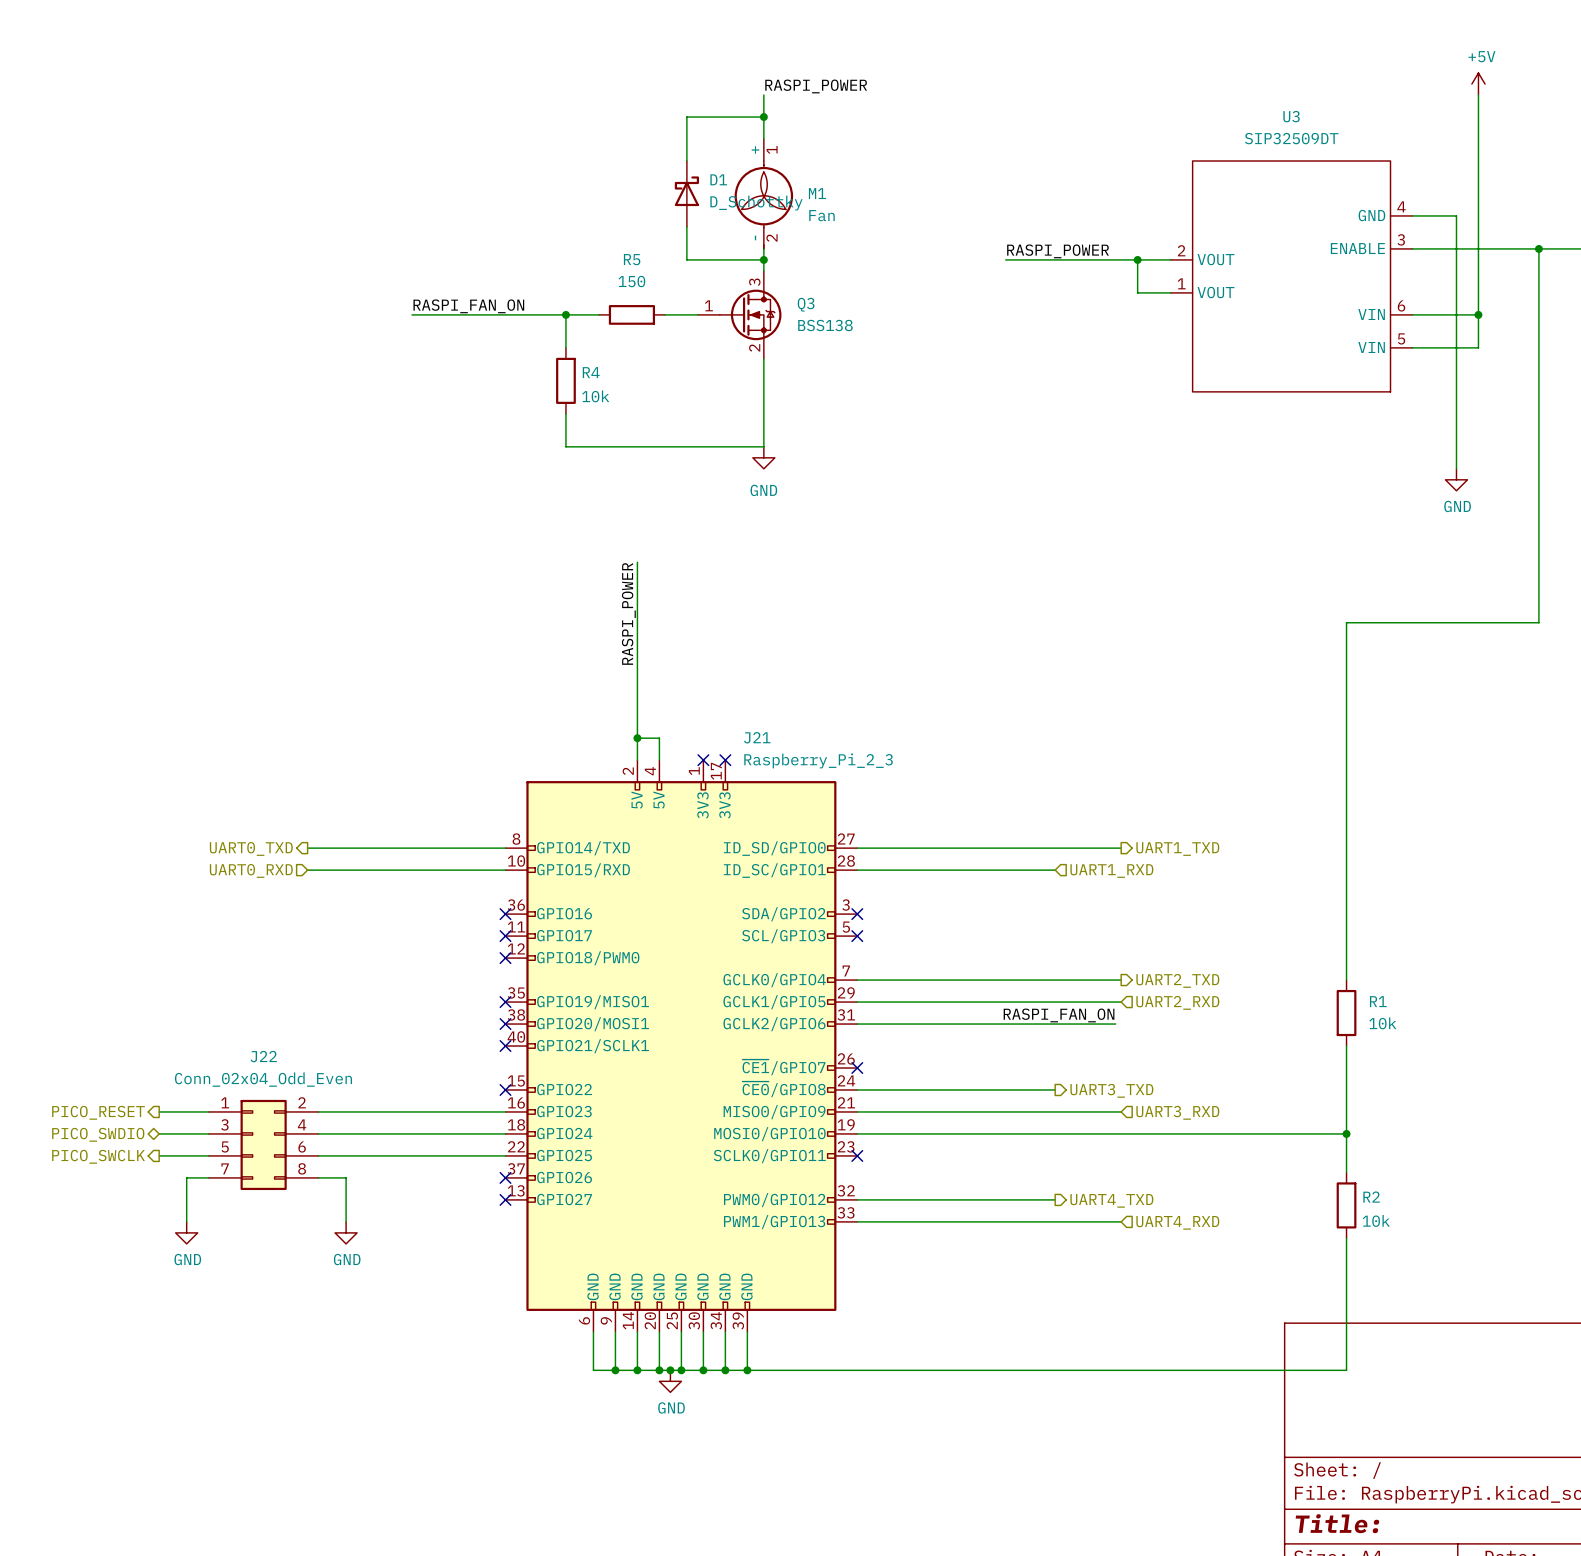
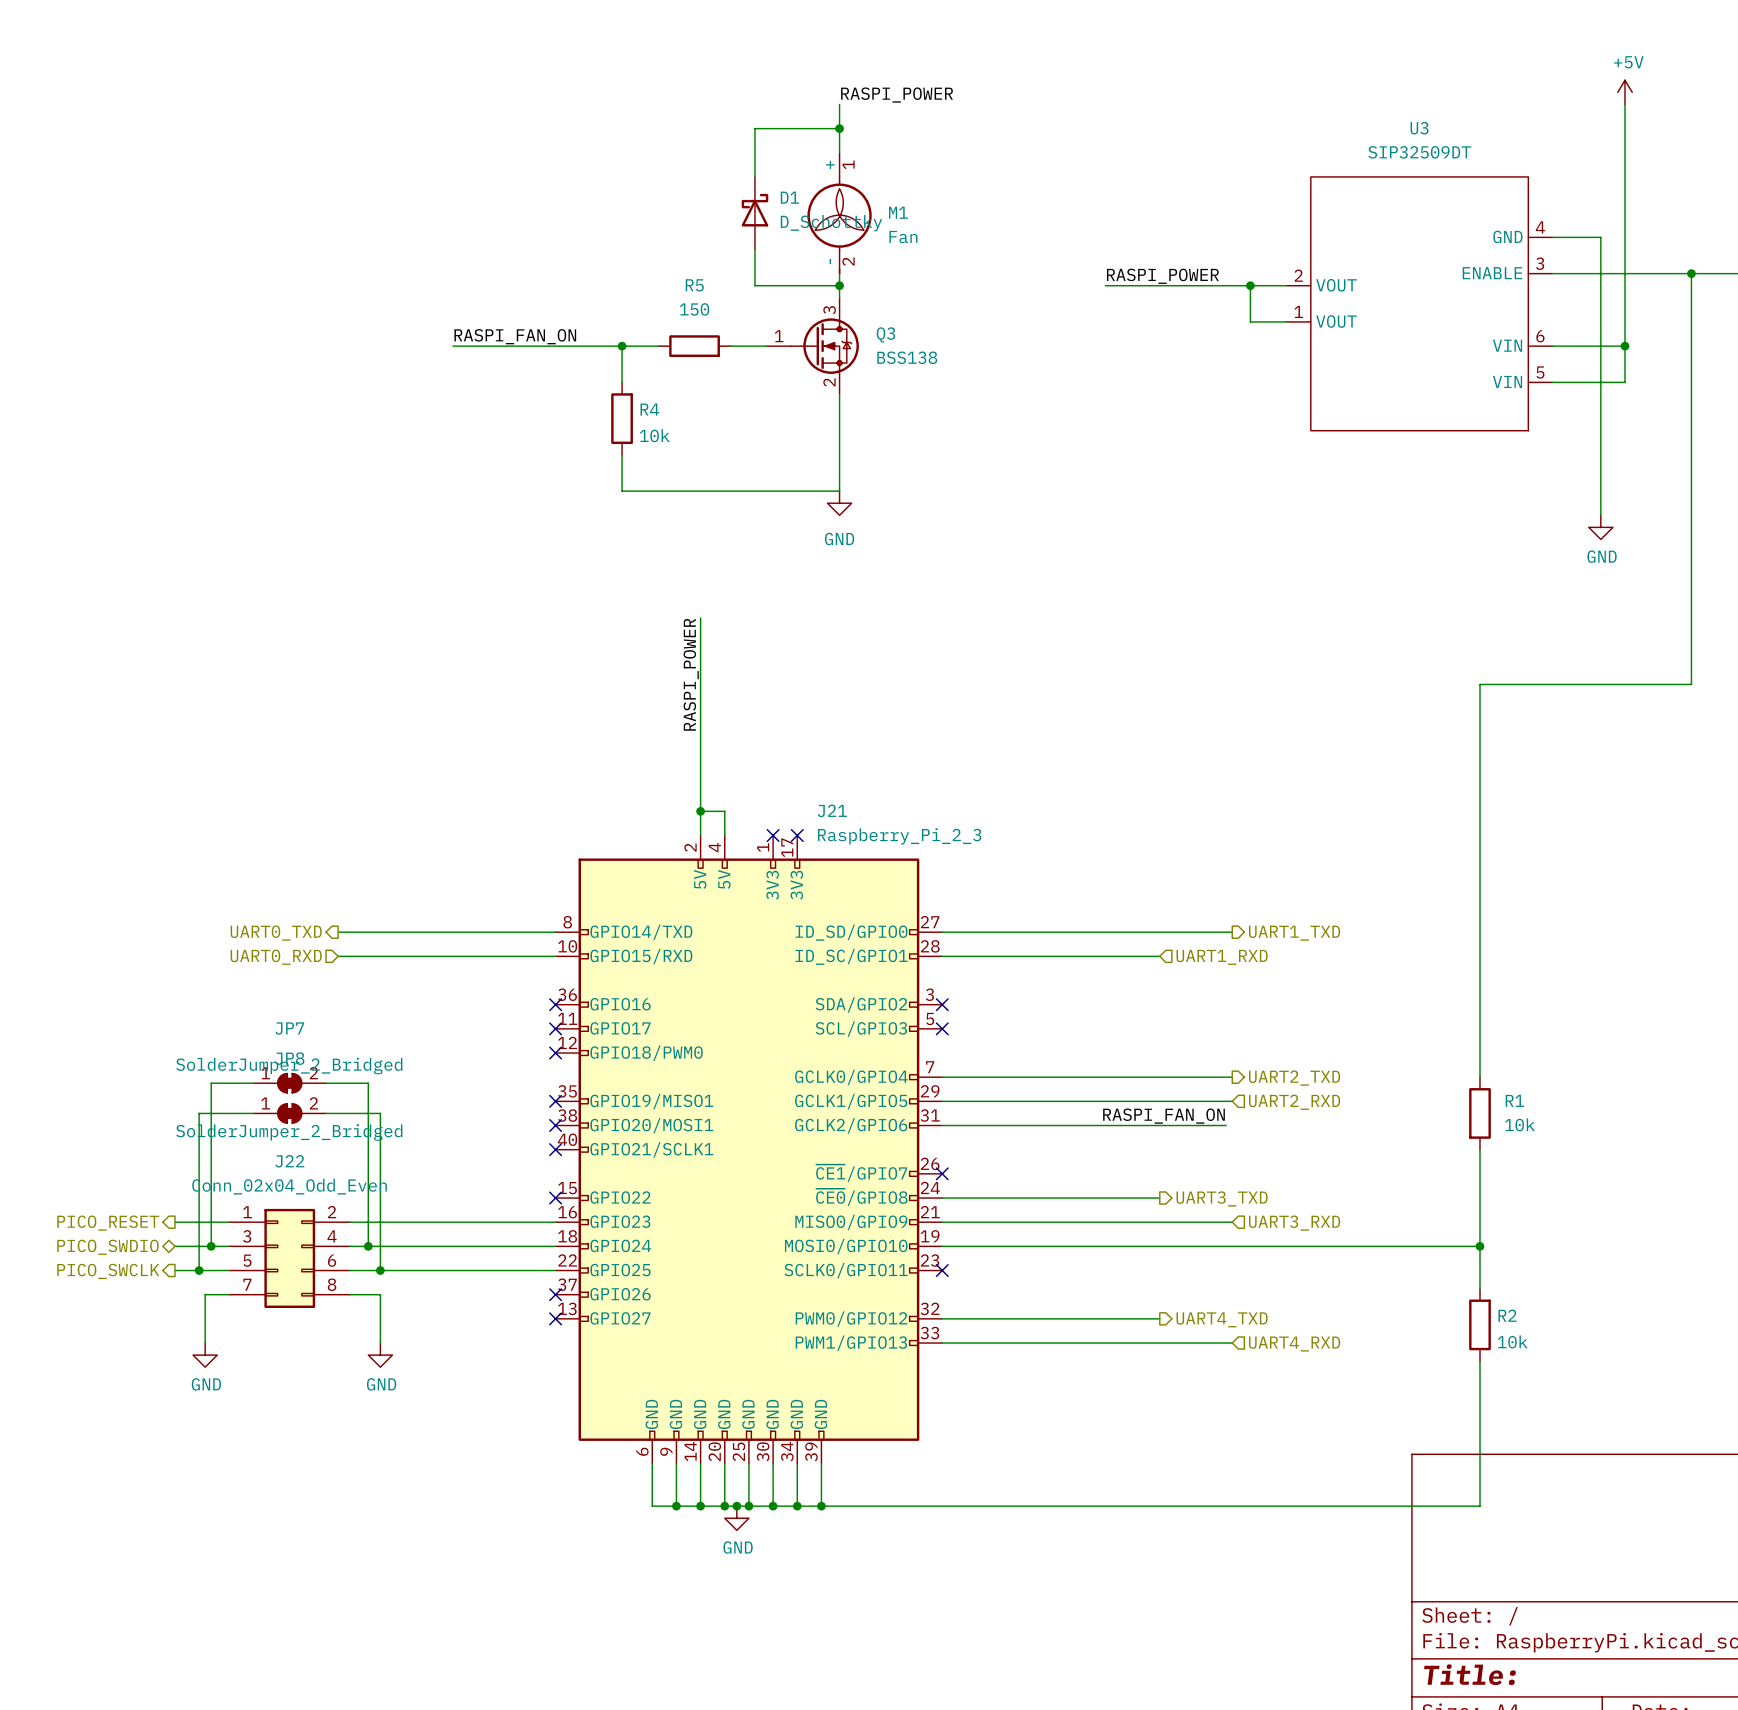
wire: none -> (253, 1083) (211, 1083) (211, 1246)
JP7: none -> SolderJumper_2_Bridged (289, 1083)
wire: none -> (326, 1083) (368, 1083) (368, 1246)
wire: none -> (253, 1113) (199, 1113) (199, 1270)
JP8: none -> SolderJumper_2_Bridged (289, 1113)
wire: none -> (326, 1113) (380, 1113) (380, 1270)
junction: none -> (211, 1246)
junction: none -> (368, 1246)
junction: none -> (199, 1270)
junction: none -> (380, 1270)

